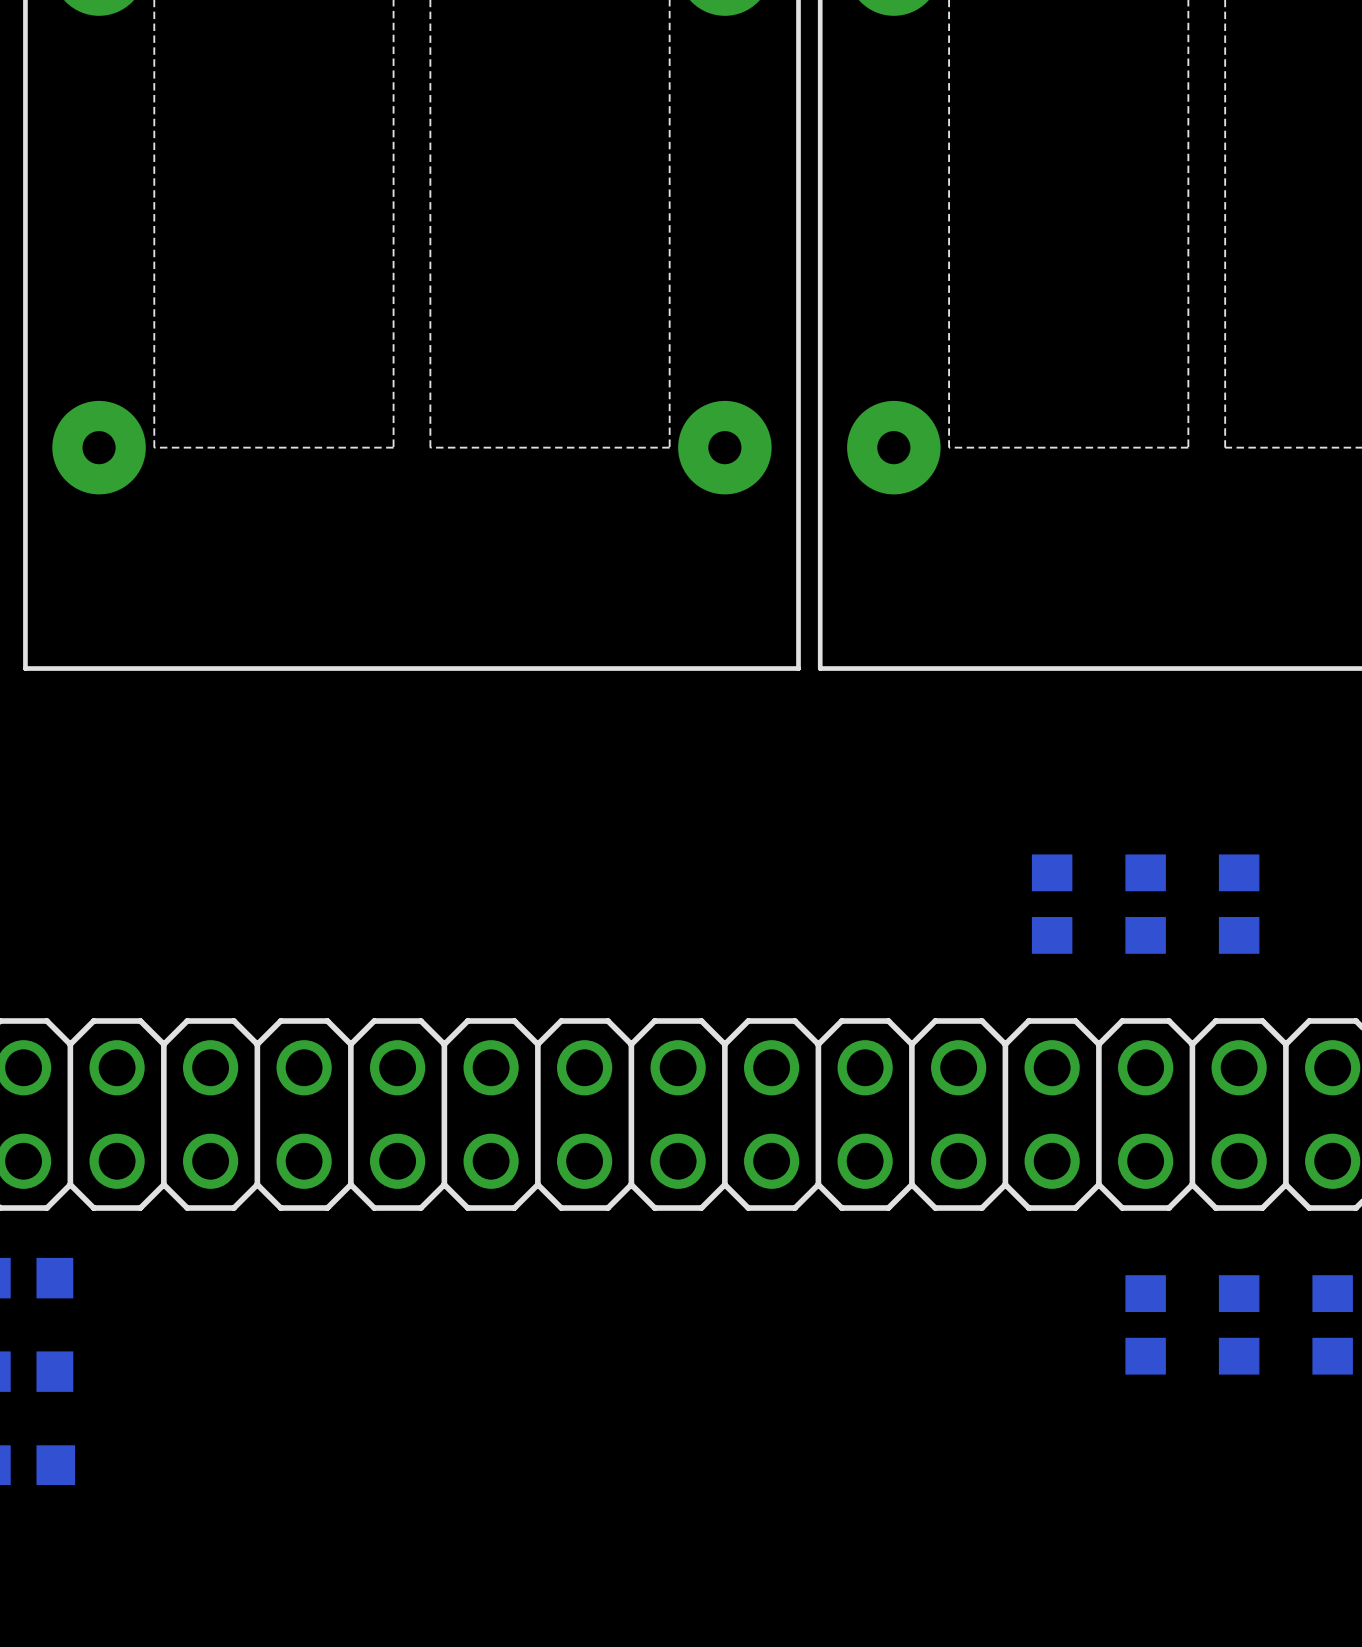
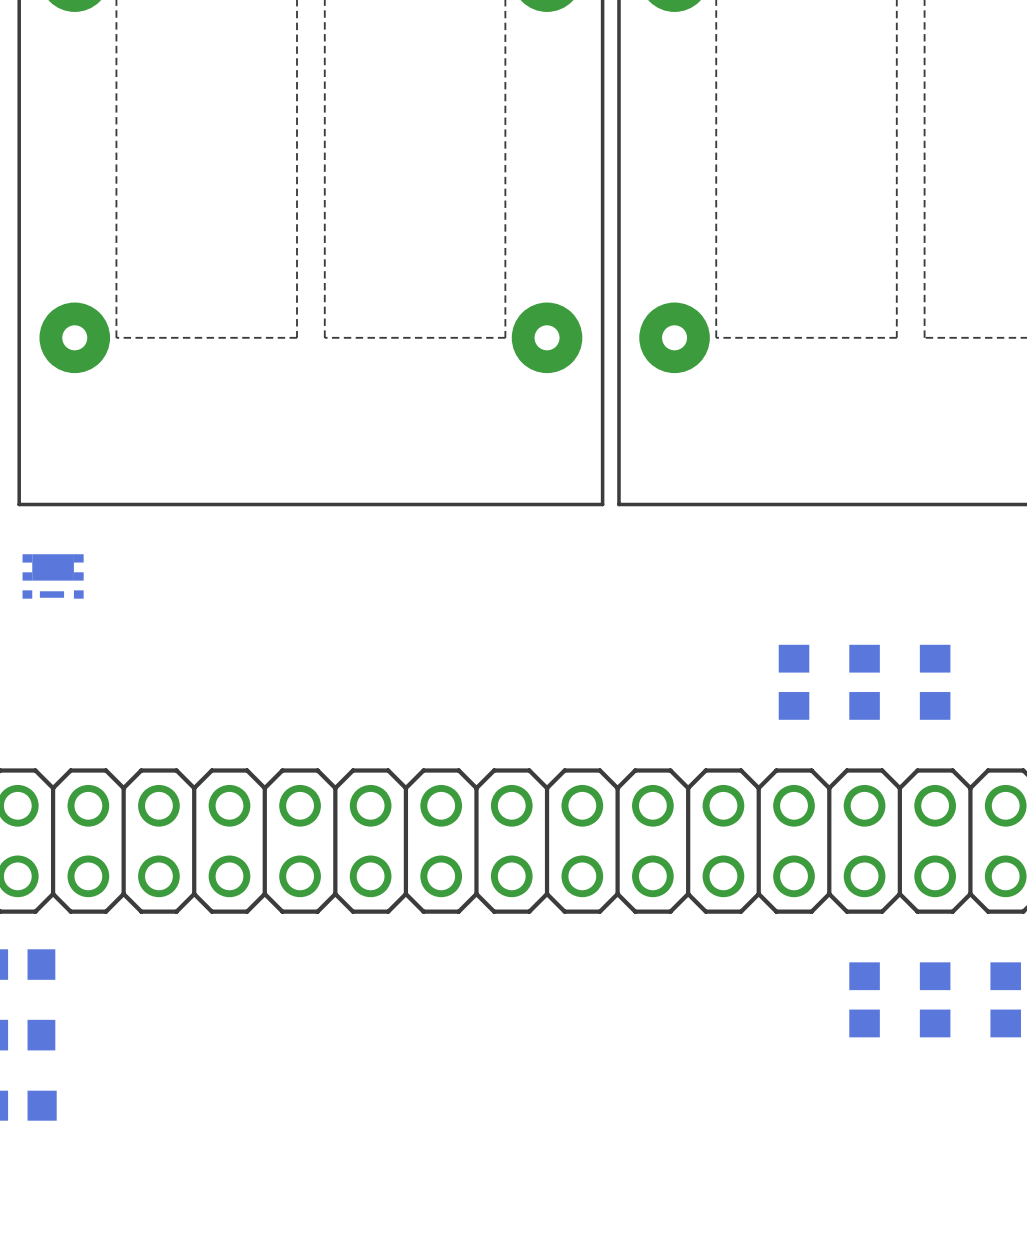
part: none -> (53, 576)

